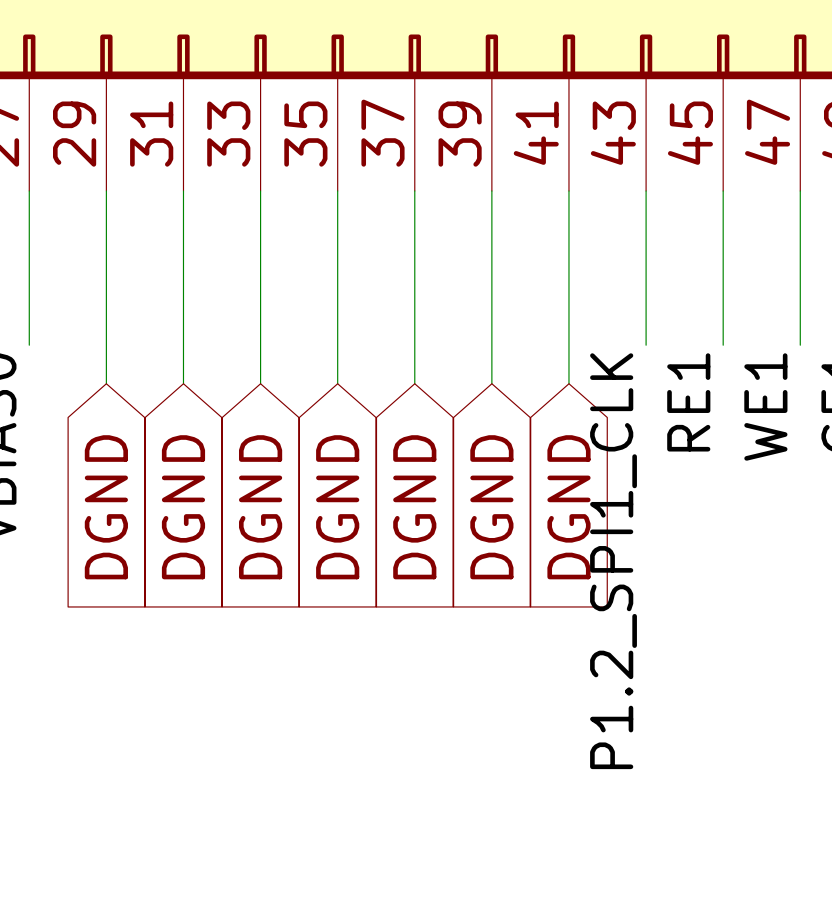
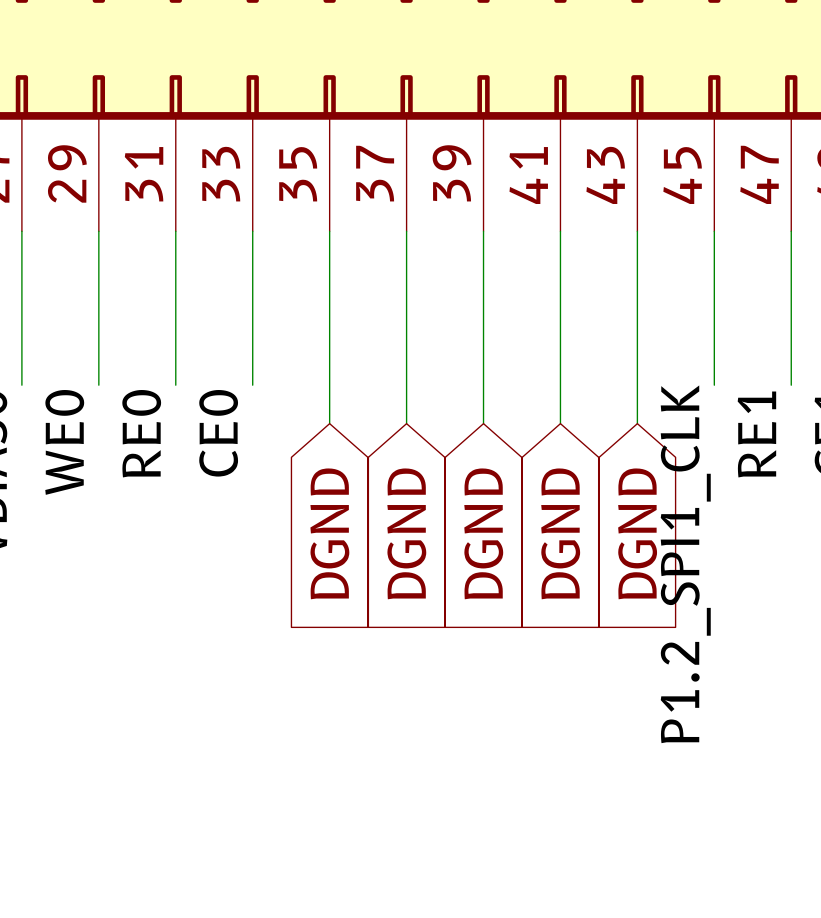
wire: (106, 345) (106, 383) -> none
wire: (183, 345) (183, 383) -> none
wire: (260, 345) (260, 383) -> (637, 385) (637, 423)
label: none -> RE0 (141, 433)
label: RE1 (688, 402) -> P1.2_SPI1_CLK (685, 564)
label: none -> CE0 (218, 433)
label: none -> WE0 (64, 442)
label: WE1 (765, 406) -> RE1 (756, 434)
global label: DGND (106, 507) -> none
global label: DGND (183, 507) -> none
global label: DGND (260, 507) -> none
global label: none -> DGND (637, 533)
label: P1.2_SPI1_CLK (613, 561) -> none

